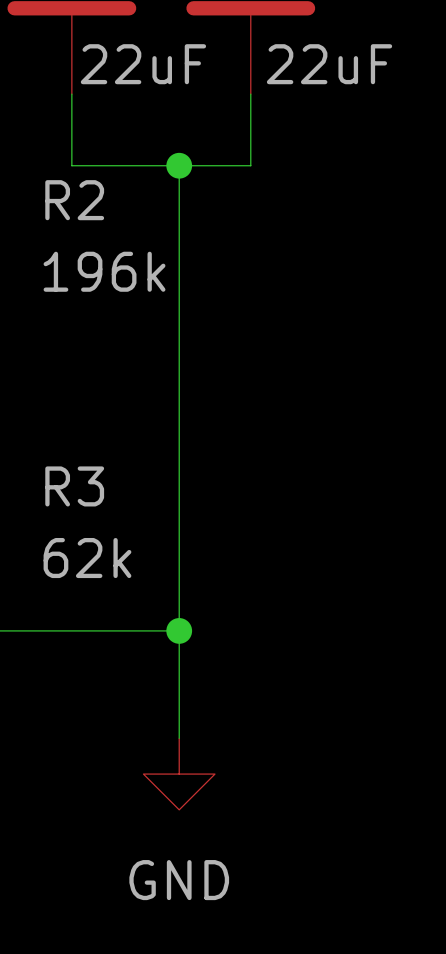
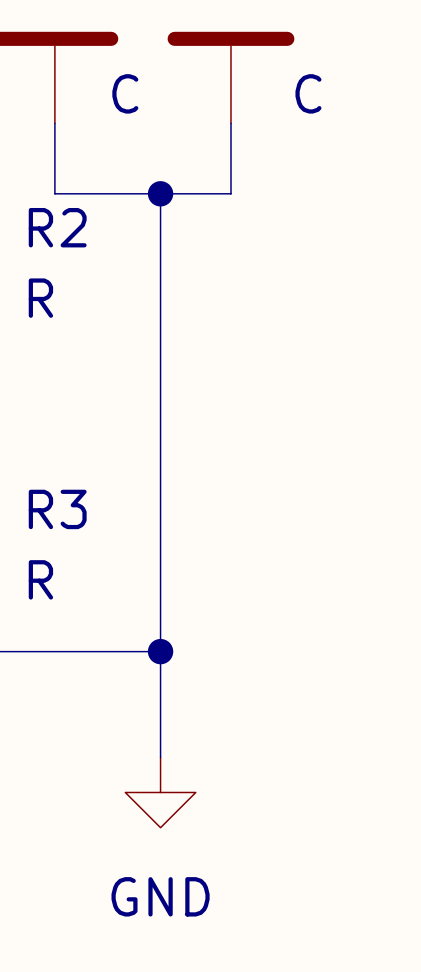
part value: 22uF (143, 64) -> C (125, 93)
part value: 22uF (329, 64) -> C (308, 93)
R2 value: 196k (104, 271) -> R (40, 298)
R3 value: 62k (87, 558) -> R (40, 579)

